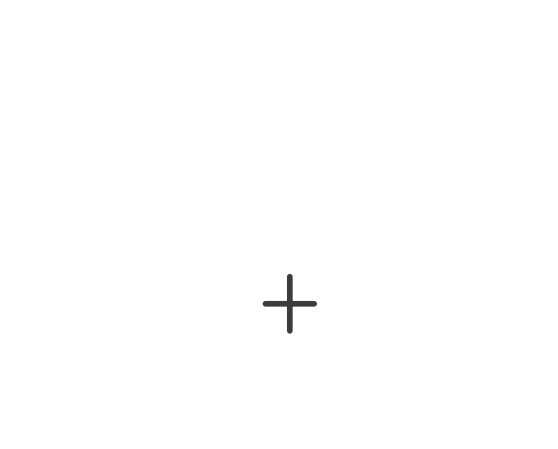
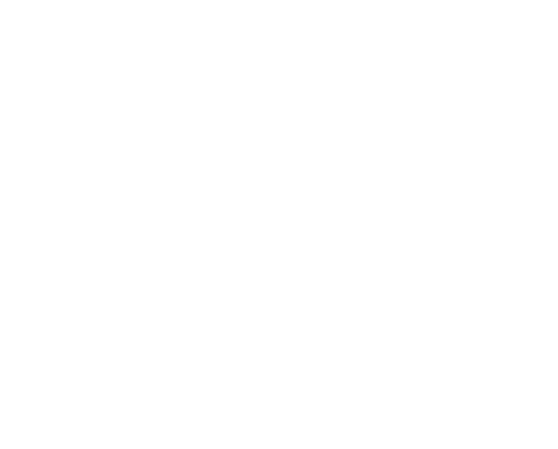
text: + (289, 303) -> none

